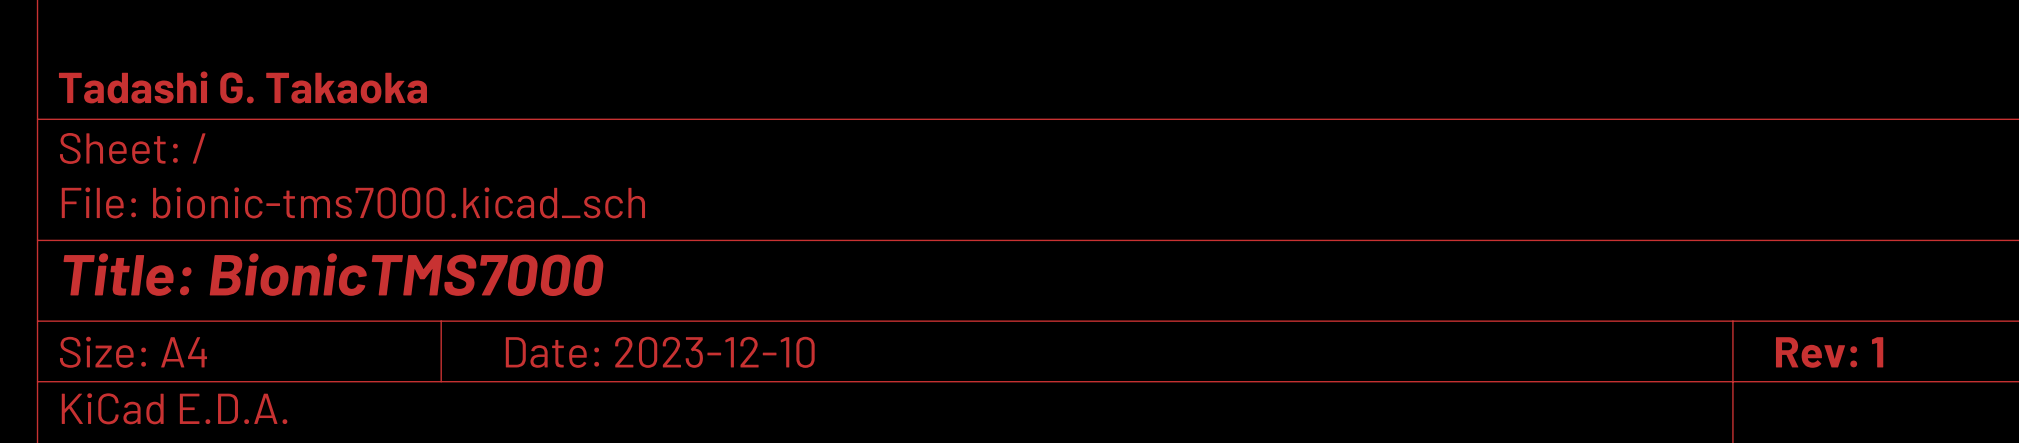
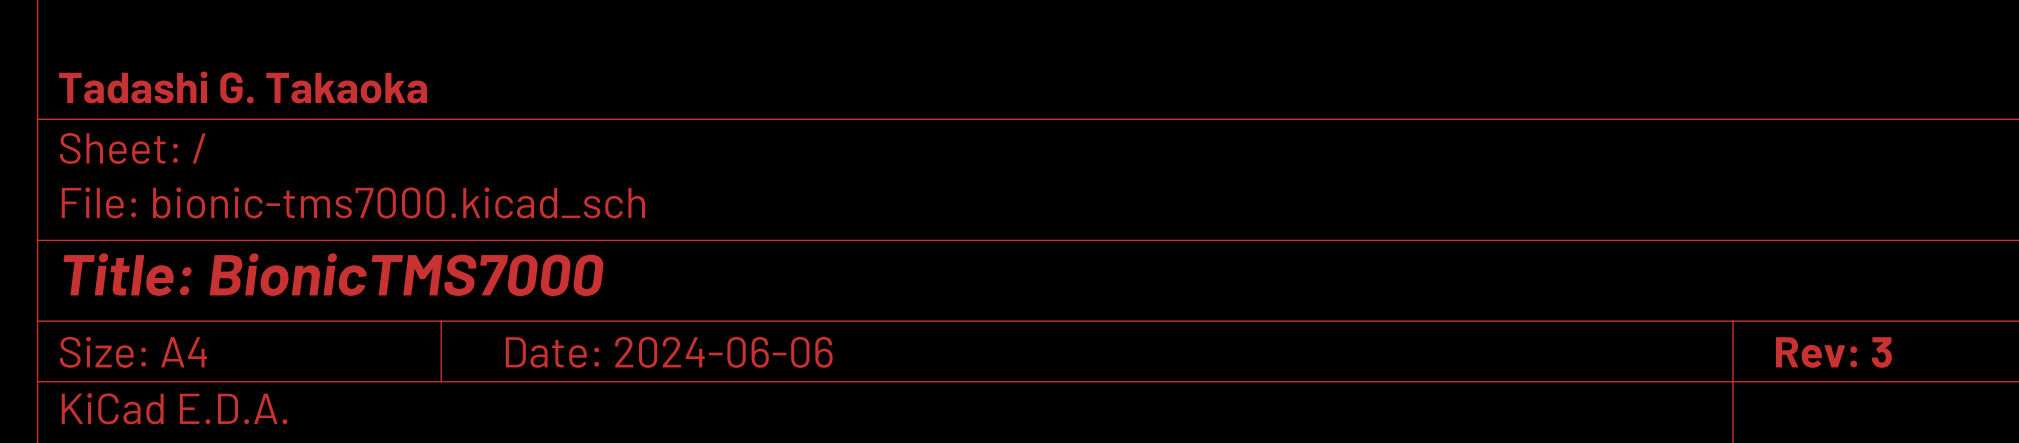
title block: Date: 2023-12-10 (660, 352) -> Date: 2024-06-06 (669, 352)
title block: Rev: 1 (1829, 352) -> Rev: 3 (1833, 352)

